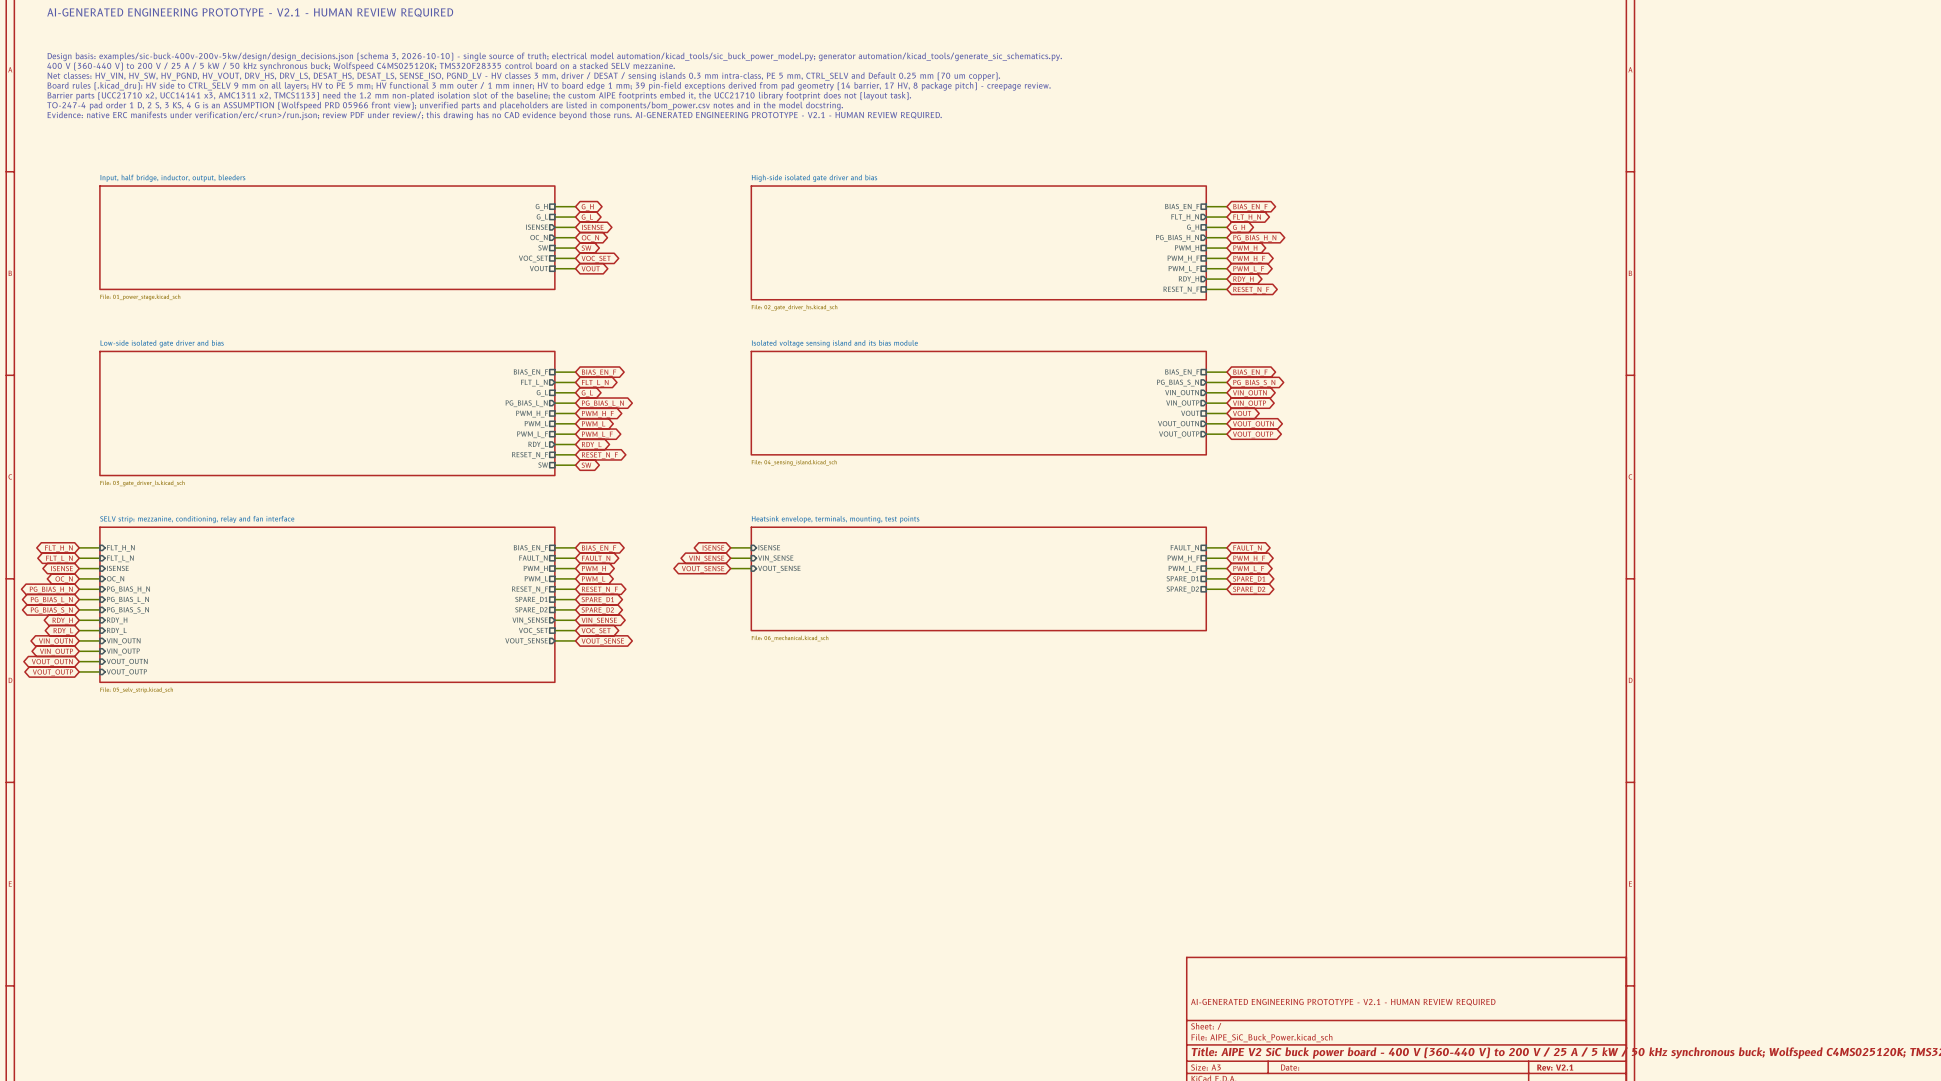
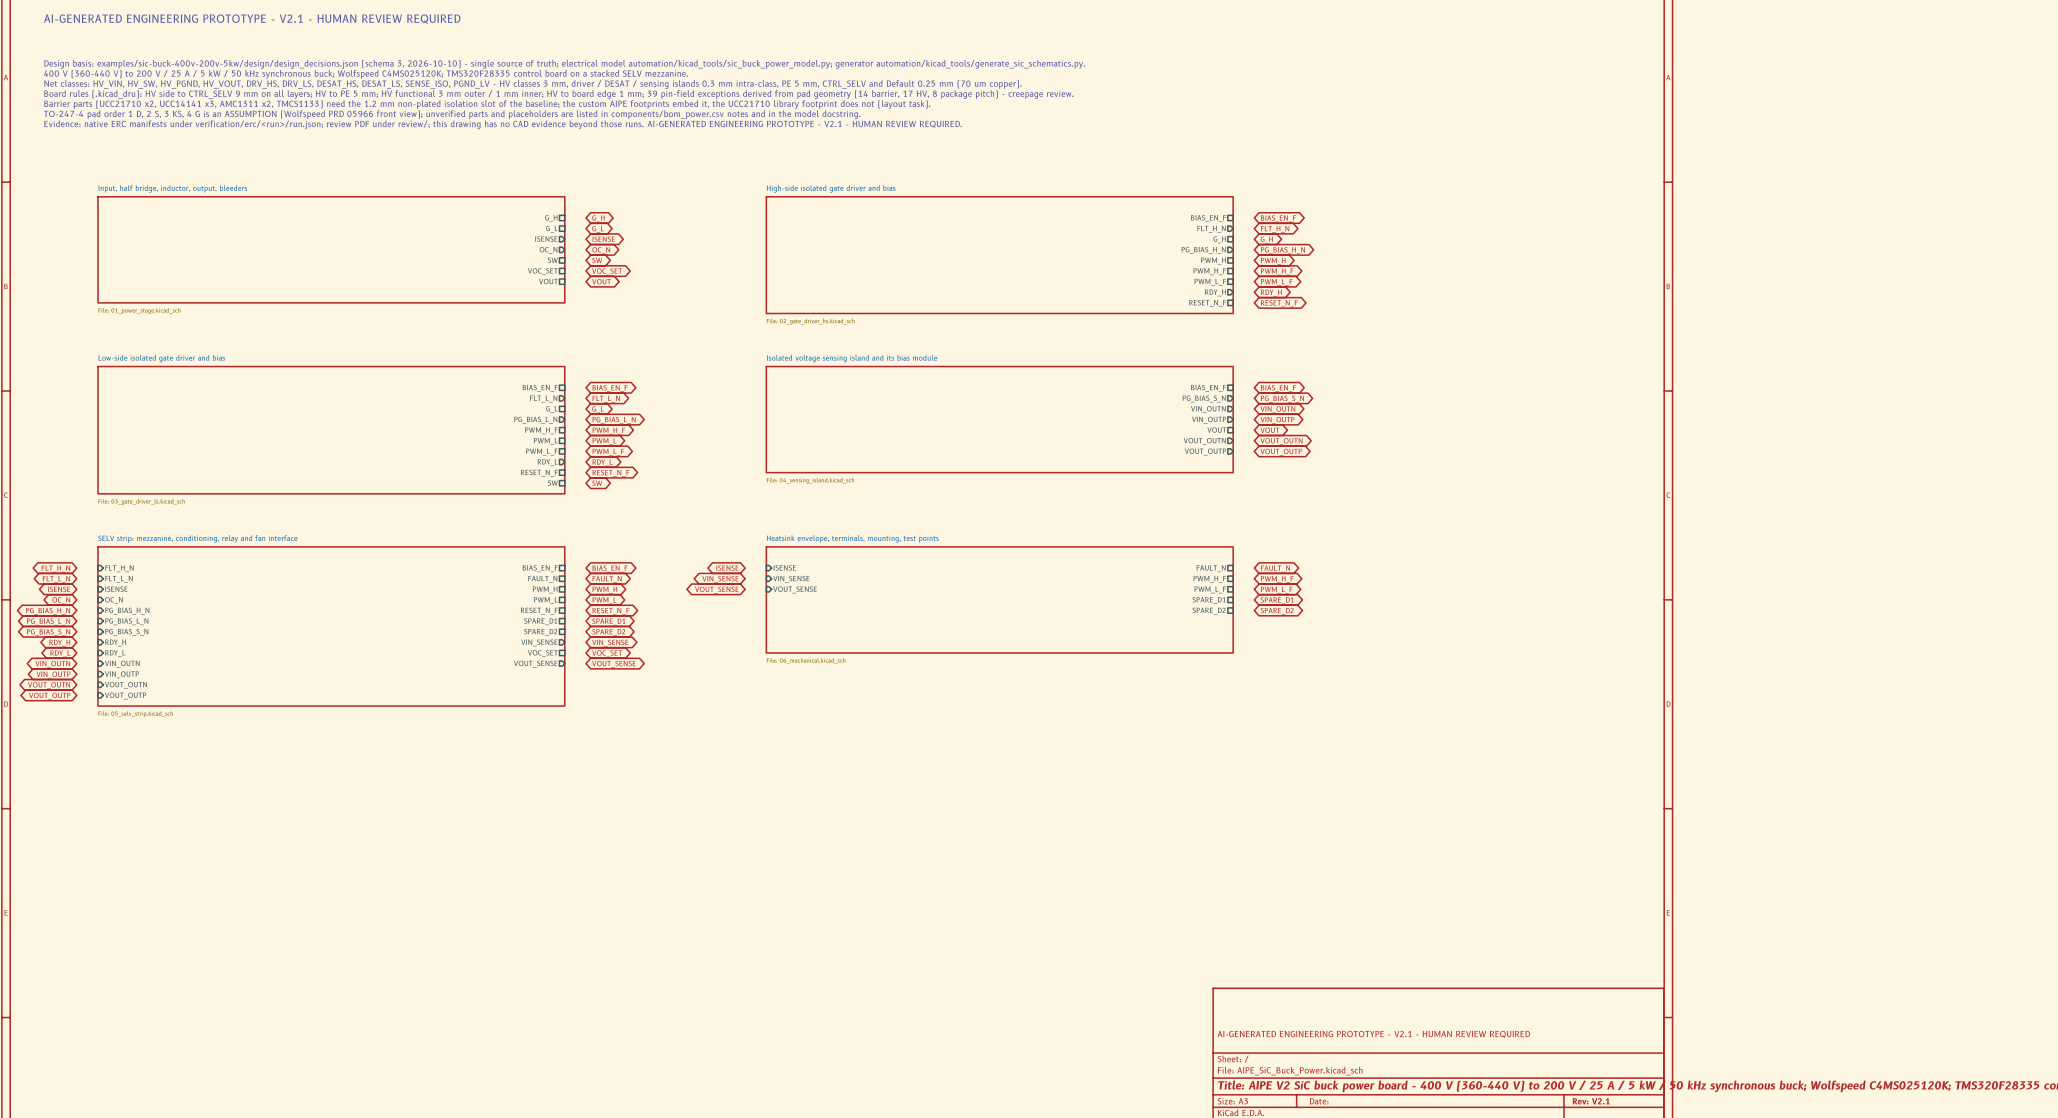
wire: (554, 206) (575, 206) -> none
wire: (1206, 206) (1226, 206) -> none
wire: (554, 217) (575, 217) -> none
wire: (1206, 217) (1226, 217) -> none
wire: (554, 227) (575, 227) -> none
wire: (1206, 227) (1226, 227) -> none
wire: (554, 237) (575, 237) -> none
wire: (1206, 237) (1226, 237) -> none
wire: (554, 248) (575, 248) -> none
wire: (1206, 248) (1226, 248) -> none
wire: (554, 258) (575, 258) -> none
wire: (1206, 258) (1226, 258) -> none
wire: (554, 268) (575, 268) -> none
wire: (1206, 268) (1226, 268) -> none
wire: (1206, 279) (1226, 279) -> none
wire: (1206, 289) (1226, 289) -> none
wire: (554, 372) (575, 372) -> none
wire: (1206, 372) (1226, 372) -> none
wire: (554, 382) (575, 382) -> none
wire: (1206, 382) (1226, 382) -> none
wire: (554, 392) (575, 392) -> none
wire: (1206, 392) (1226, 392) -> none
wire: (554, 403) (575, 403) -> none
wire: (1206, 403) (1226, 403) -> none
wire: (554, 413) (575, 413) -> none
wire: (1206, 413) (1226, 413) -> none
wire: (554, 423) (575, 423) -> none
wire: (1206, 423) (1226, 423) -> none
wire: (554, 434) (575, 434) -> none
wire: (1206, 434) (1226, 434) -> none
wire: (554, 444) (575, 444) -> none
wire: (554, 454) (575, 454) -> none
wire: (554, 465) (575, 465) -> none
wire: (79, 547) (99, 547) -> none
wire: (554, 547) (575, 547) -> none
wire: (730, 547) (751, 547) -> none
wire: (1206, 547) (1226, 547) -> none
wire: (79, 558) (99, 558) -> none
wire: (554, 558) (575, 558) -> none
wire: (730, 558) (751, 558) -> none
wire: (1206, 558) (1226, 558) -> none
wire: (79, 568) (99, 568) -> none
wire: (554, 568) (575, 568) -> none
wire: (730, 568) (751, 568) -> none
wire: (1206, 568) (1226, 568) -> none
wire: (79, 578) (99, 578) -> none
wire: (554, 578) (575, 578) -> none
wire: (1206, 578) (1226, 578) -> none
wire: (79, 589) (99, 589) -> none
wire: (554, 589) (575, 589) -> none
wire: (1206, 589) (1226, 589) -> none
wire: (79, 599) (99, 599) -> none
wire: (554, 599) (575, 599) -> none
wire: (79, 609) (99, 609) -> none
wire: (554, 609) (575, 609) -> none
wire: (79, 620) (99, 620) -> none
wire: (554, 620) (575, 620) -> none
wire: (79, 630) (99, 630) -> none
wire: (554, 630) (575, 630) -> none
wire: (79, 640) (99, 640) -> none
wire: (554, 640) (575, 640) -> none
wire: (79, 651) (99, 651) -> none
wire: (79, 661) (99, 661) -> none
wire: (79, 671) (99, 671) -> none

